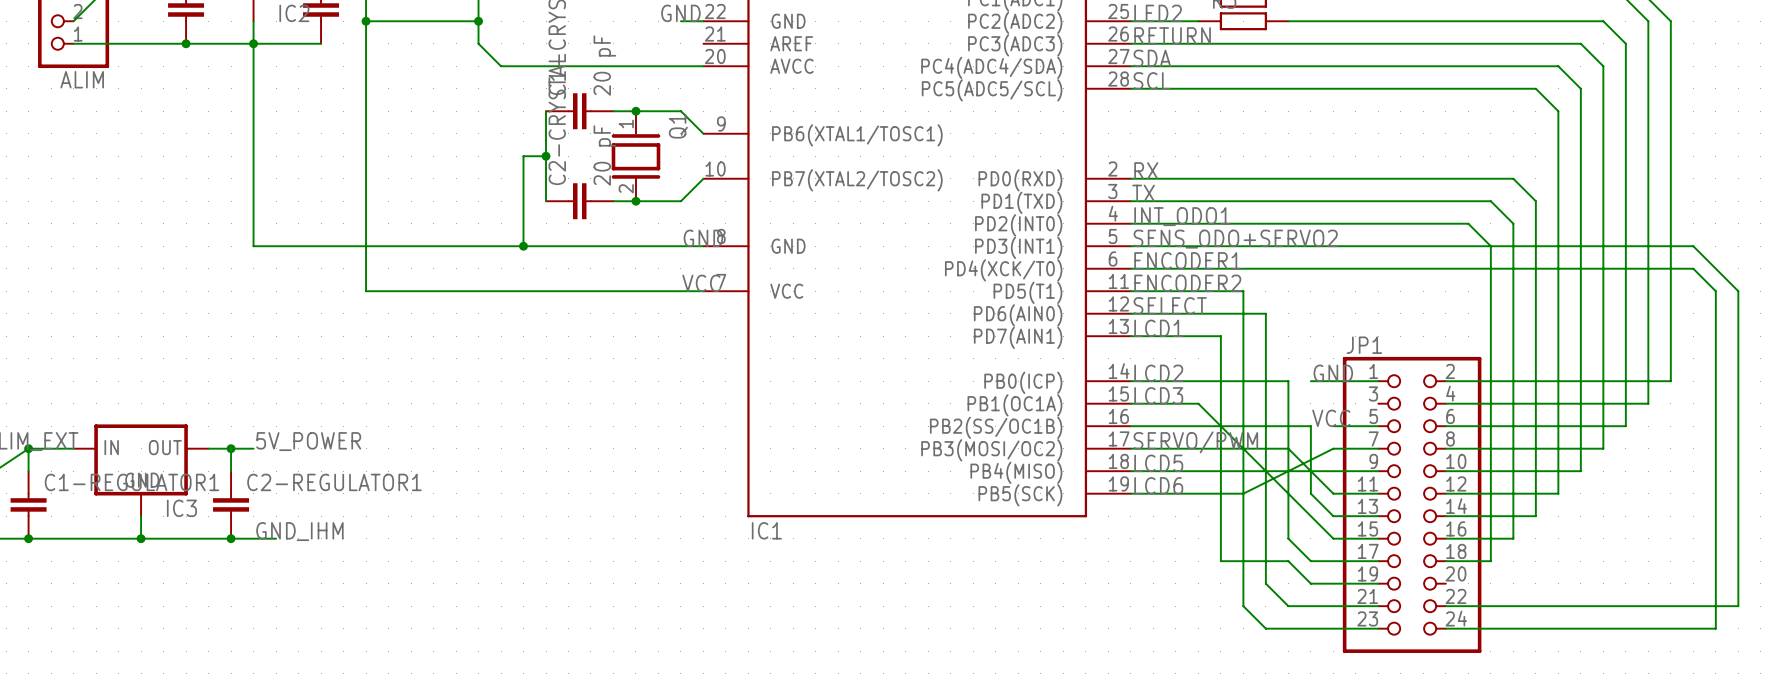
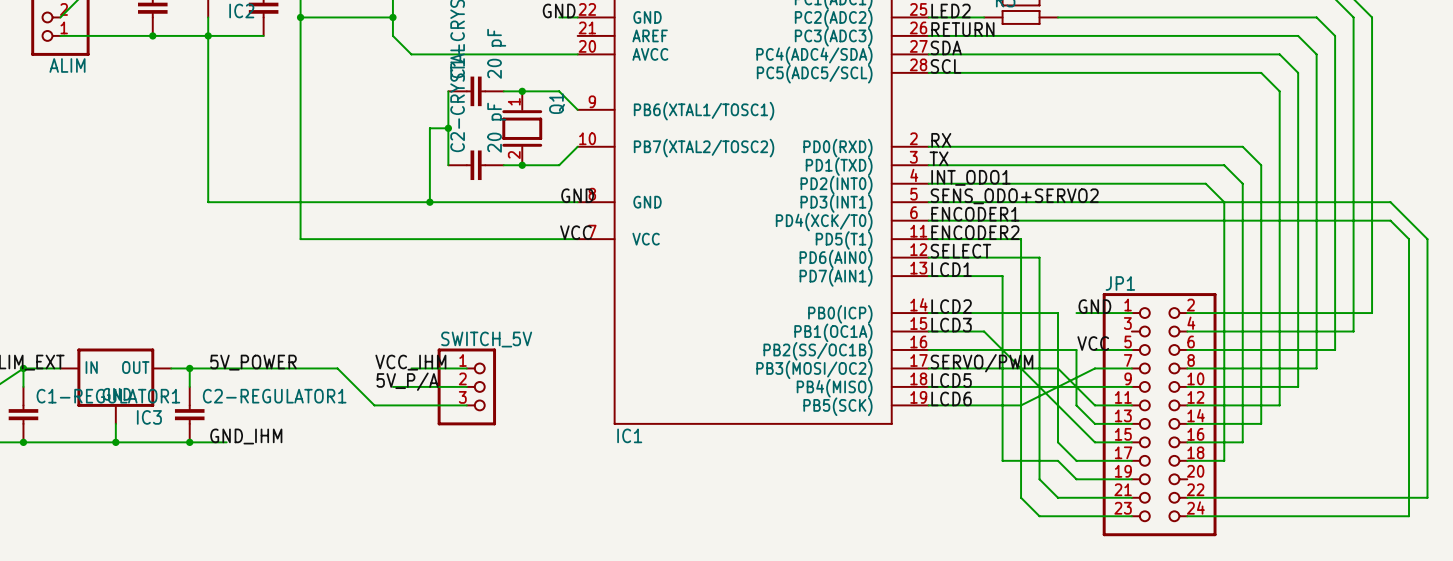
label: none -> VCC_IHM (410, 362)
wire: none -> (208, 368) (337, 368) (374, 405) (466, 405)
wire: none -> (411, 368) (466, 368)
label: none -> 5V_P/A (407, 381)
wire: none -> (392, 386) (466, 386)
SWITCH_5V: none -> (466, 386)

